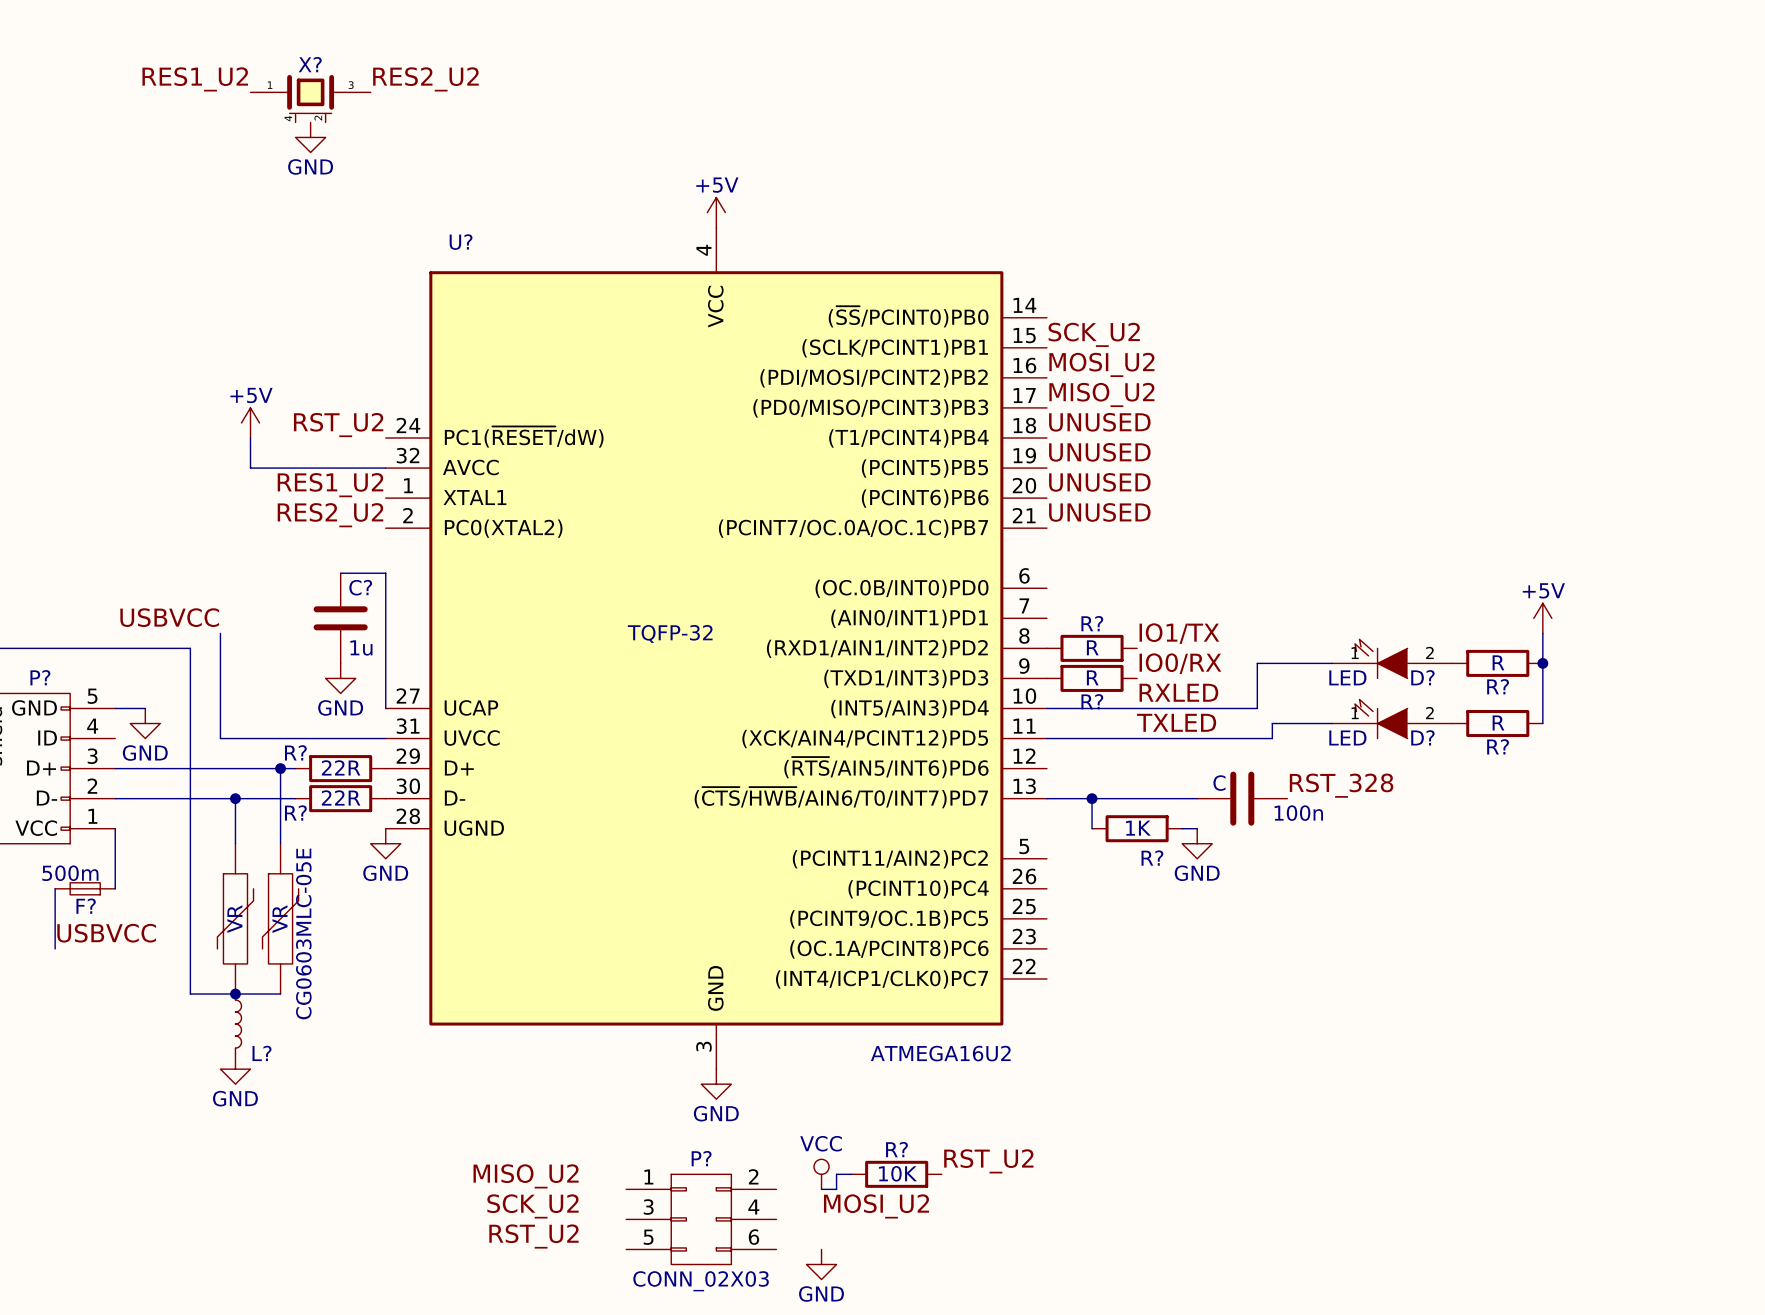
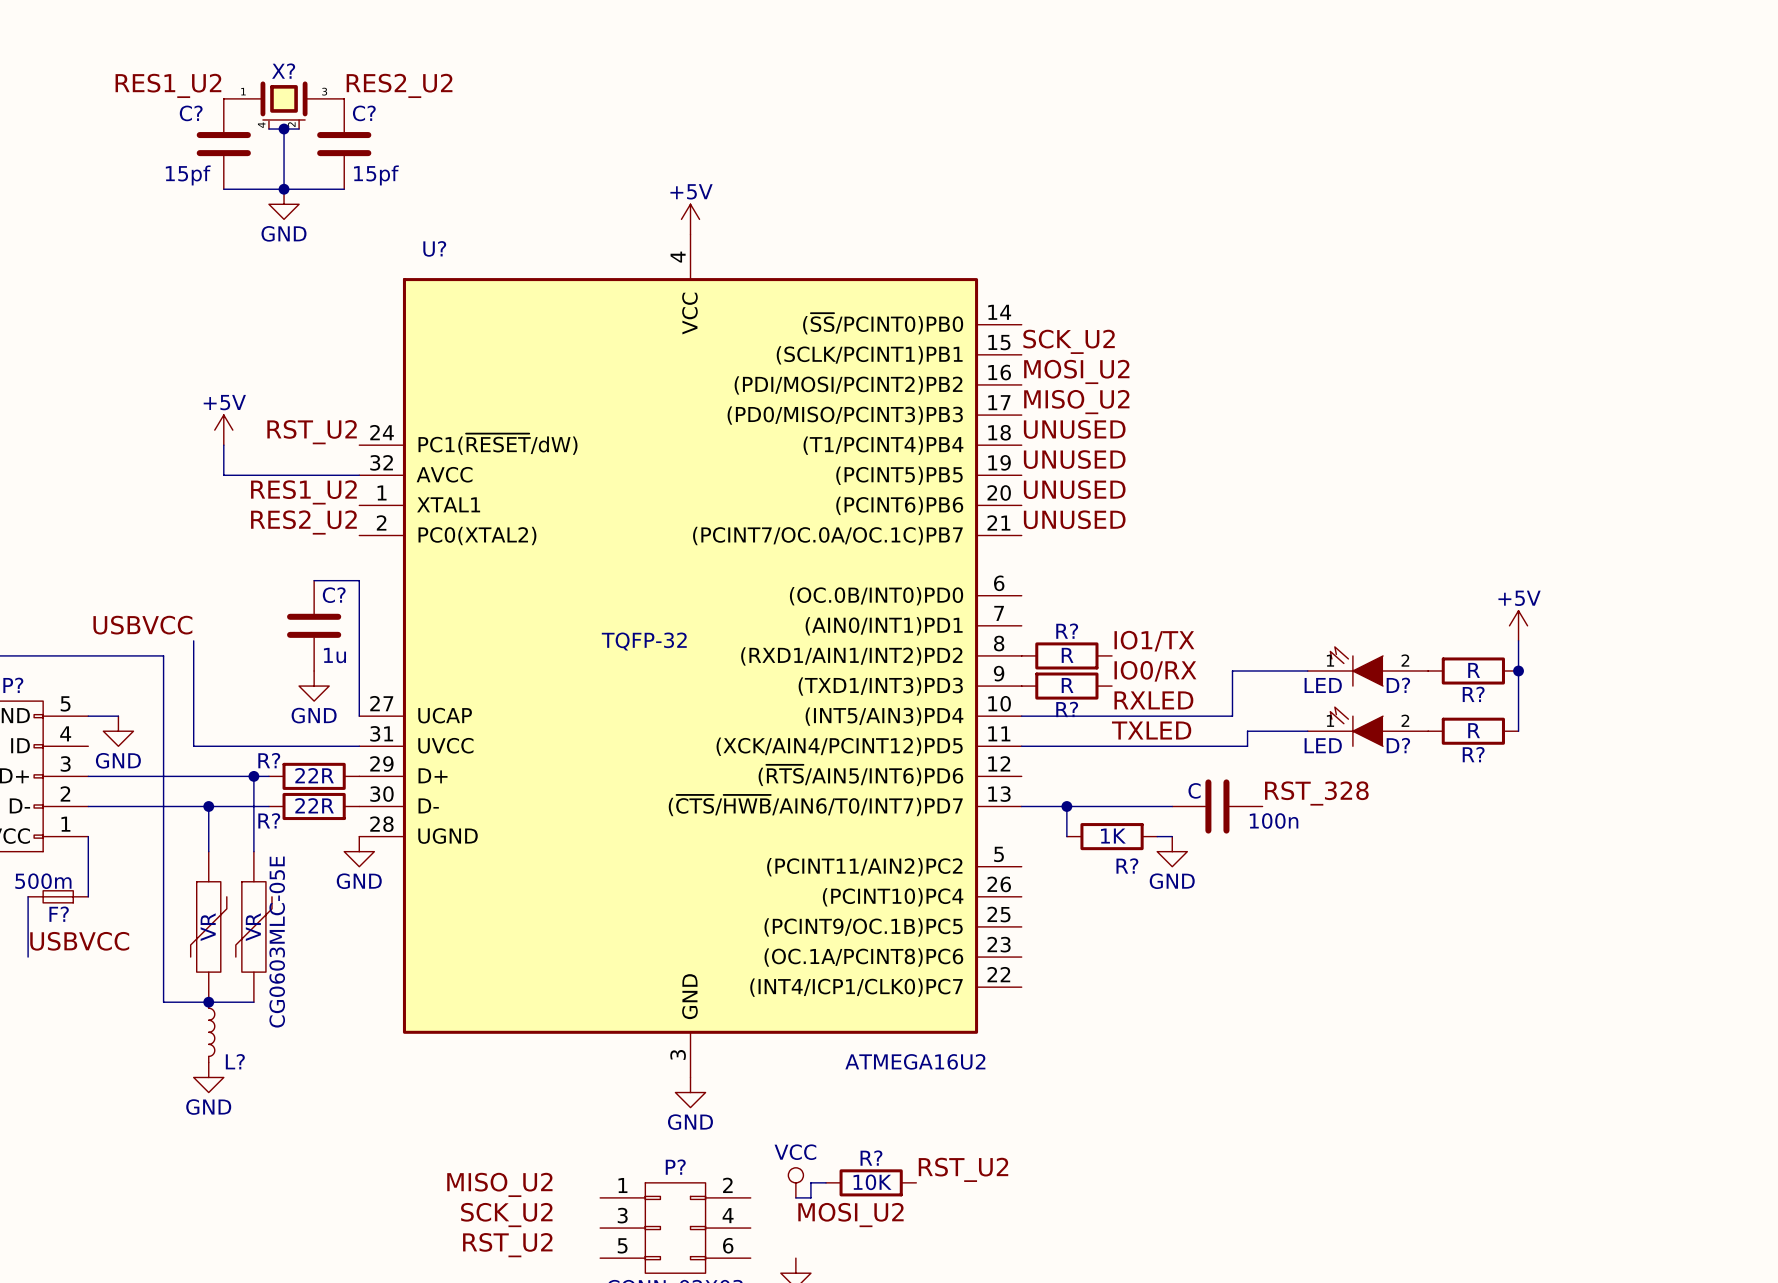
wire: none -> (268, 129) (299, 129)
wire: none -> (284, 129) (284, 189)
junction: none -> (284, 129)
C?: none -> 15pf (223, 144)
power symbol position: GND (310, 137) -> GND (284, 204)
C?: none -> 15pf (344, 144)
wire: none -> (223, 189) (344, 189)
junction: none -> (284, 189)

